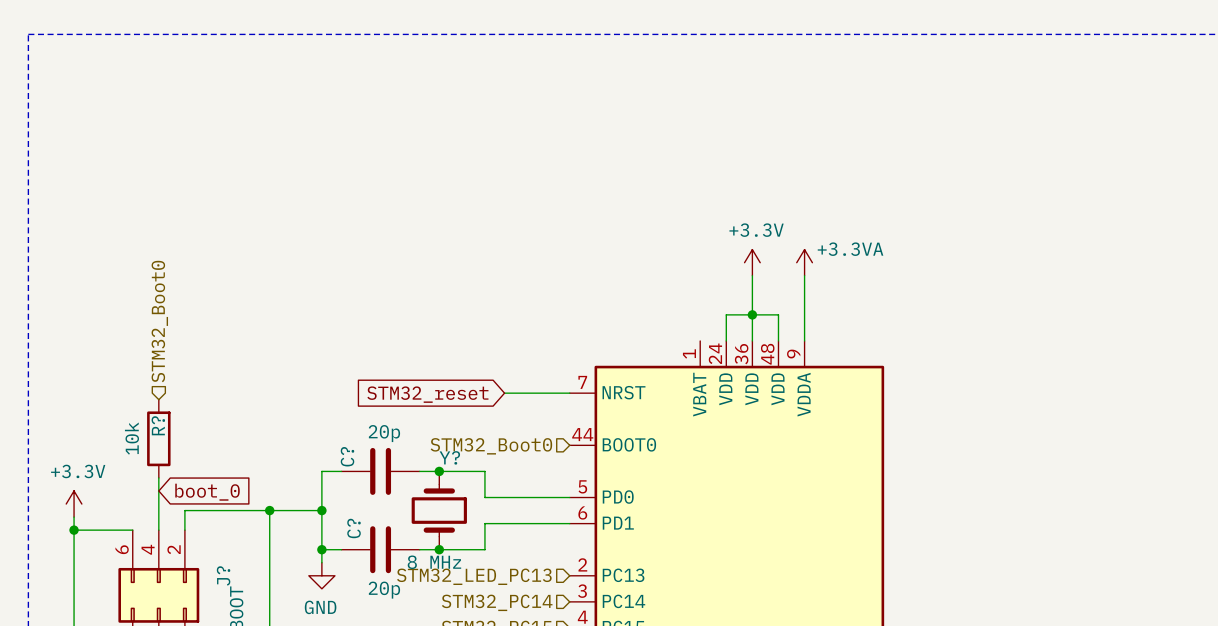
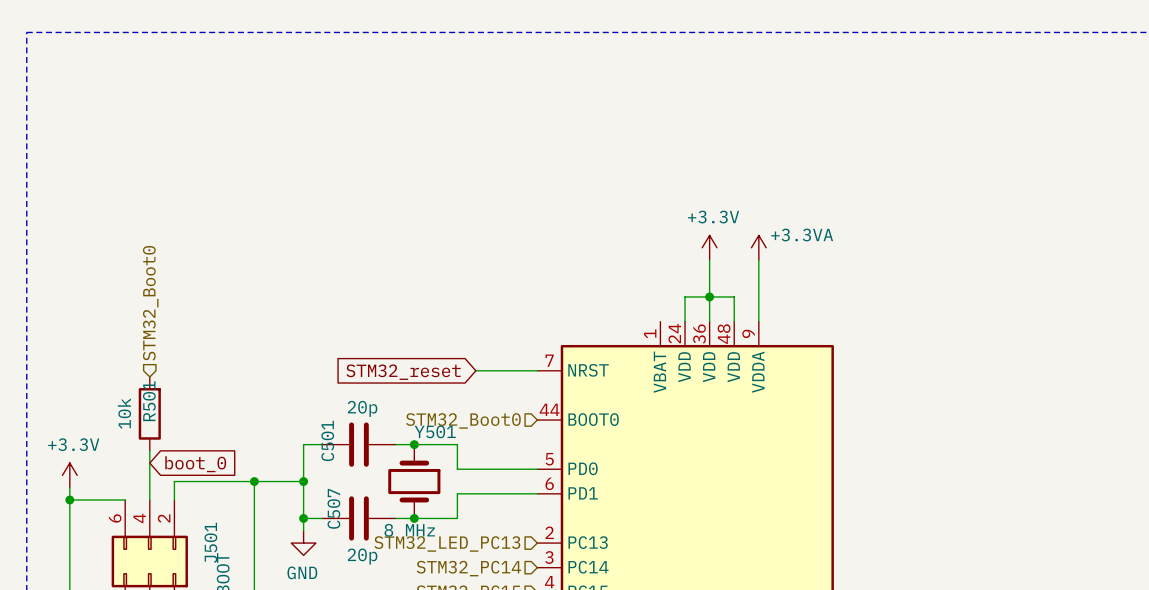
R? name: R? (158, 425) -> R501 (149, 401)
C? name: C? (347, 456) -> C501 (327, 440)
Y? name: Y? (449, 457) -> Y501 (435, 431)
C? name: C? (354, 528) -> C507 (333, 508)
J? name: J? (223, 575) -> J501 (210, 542)

